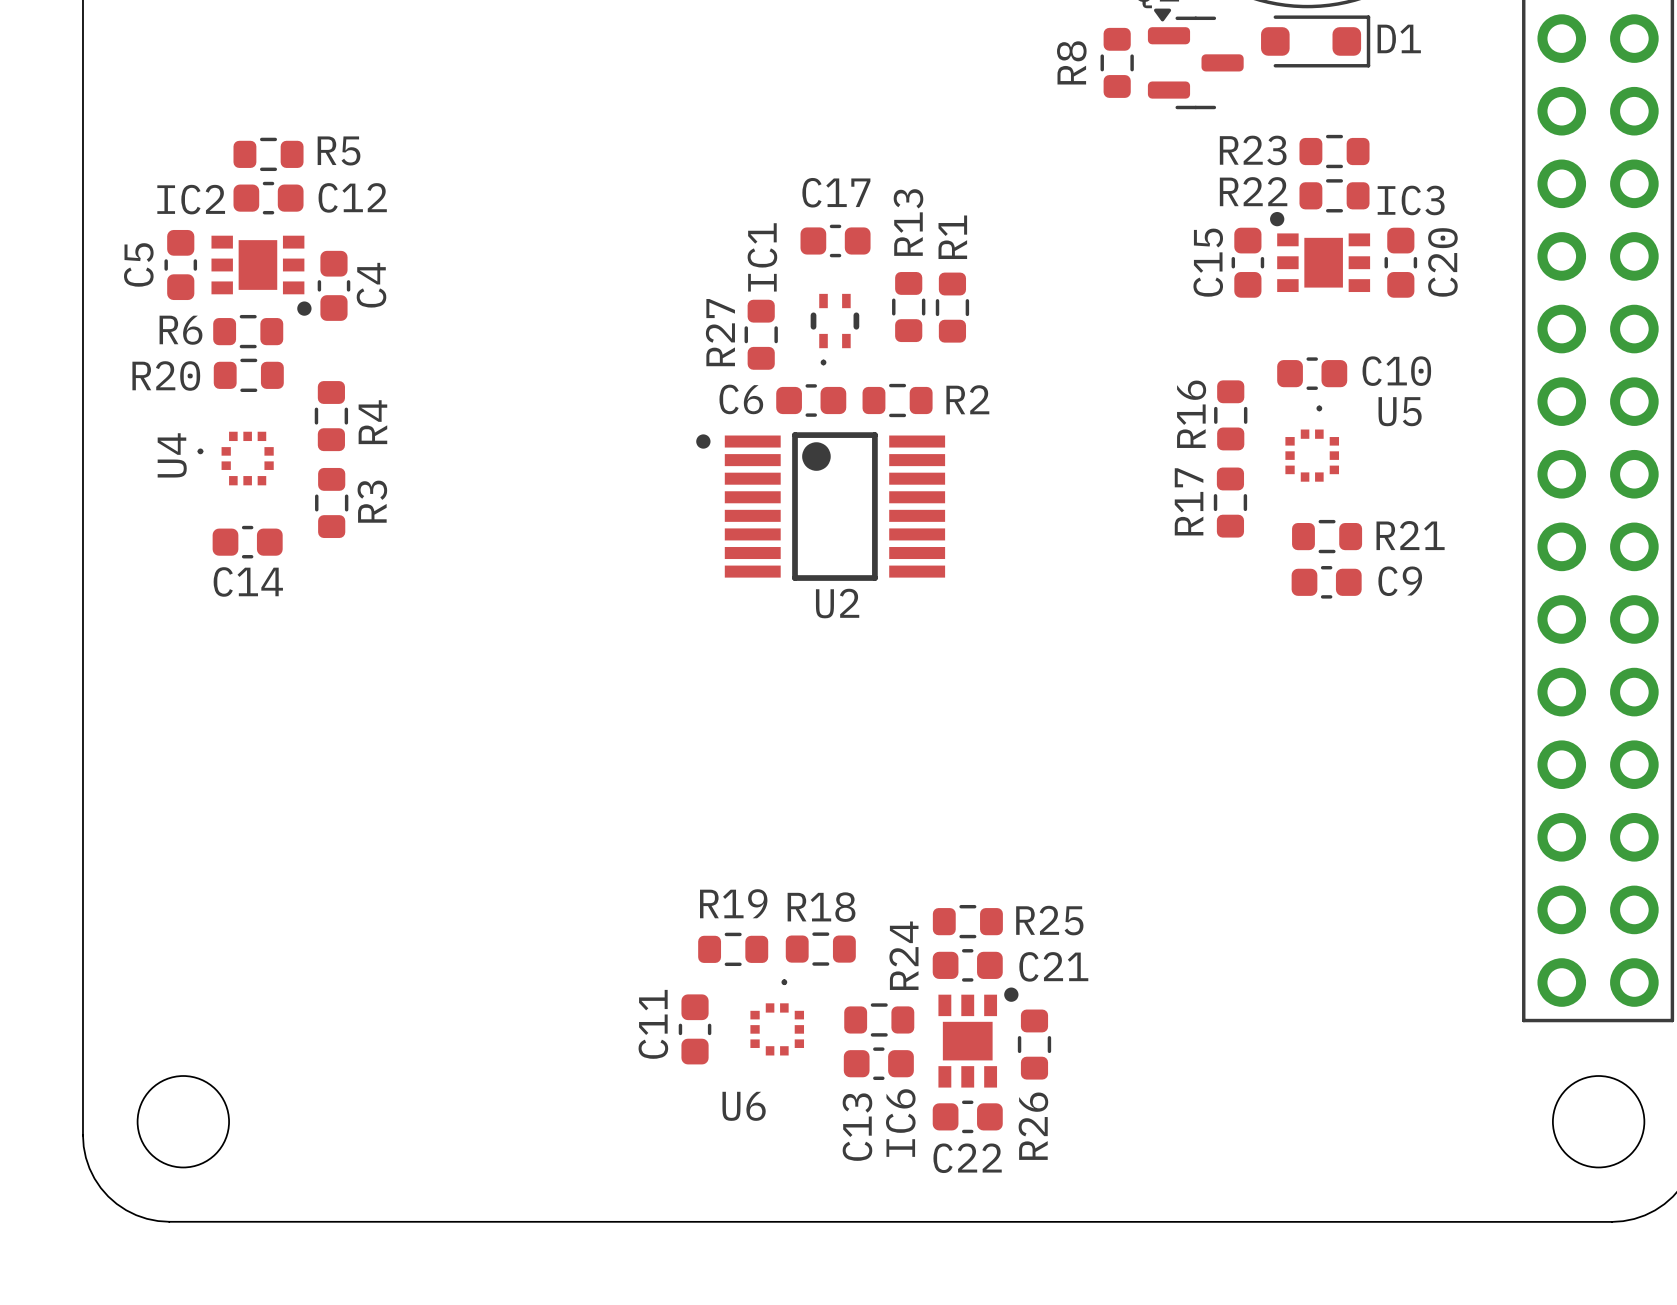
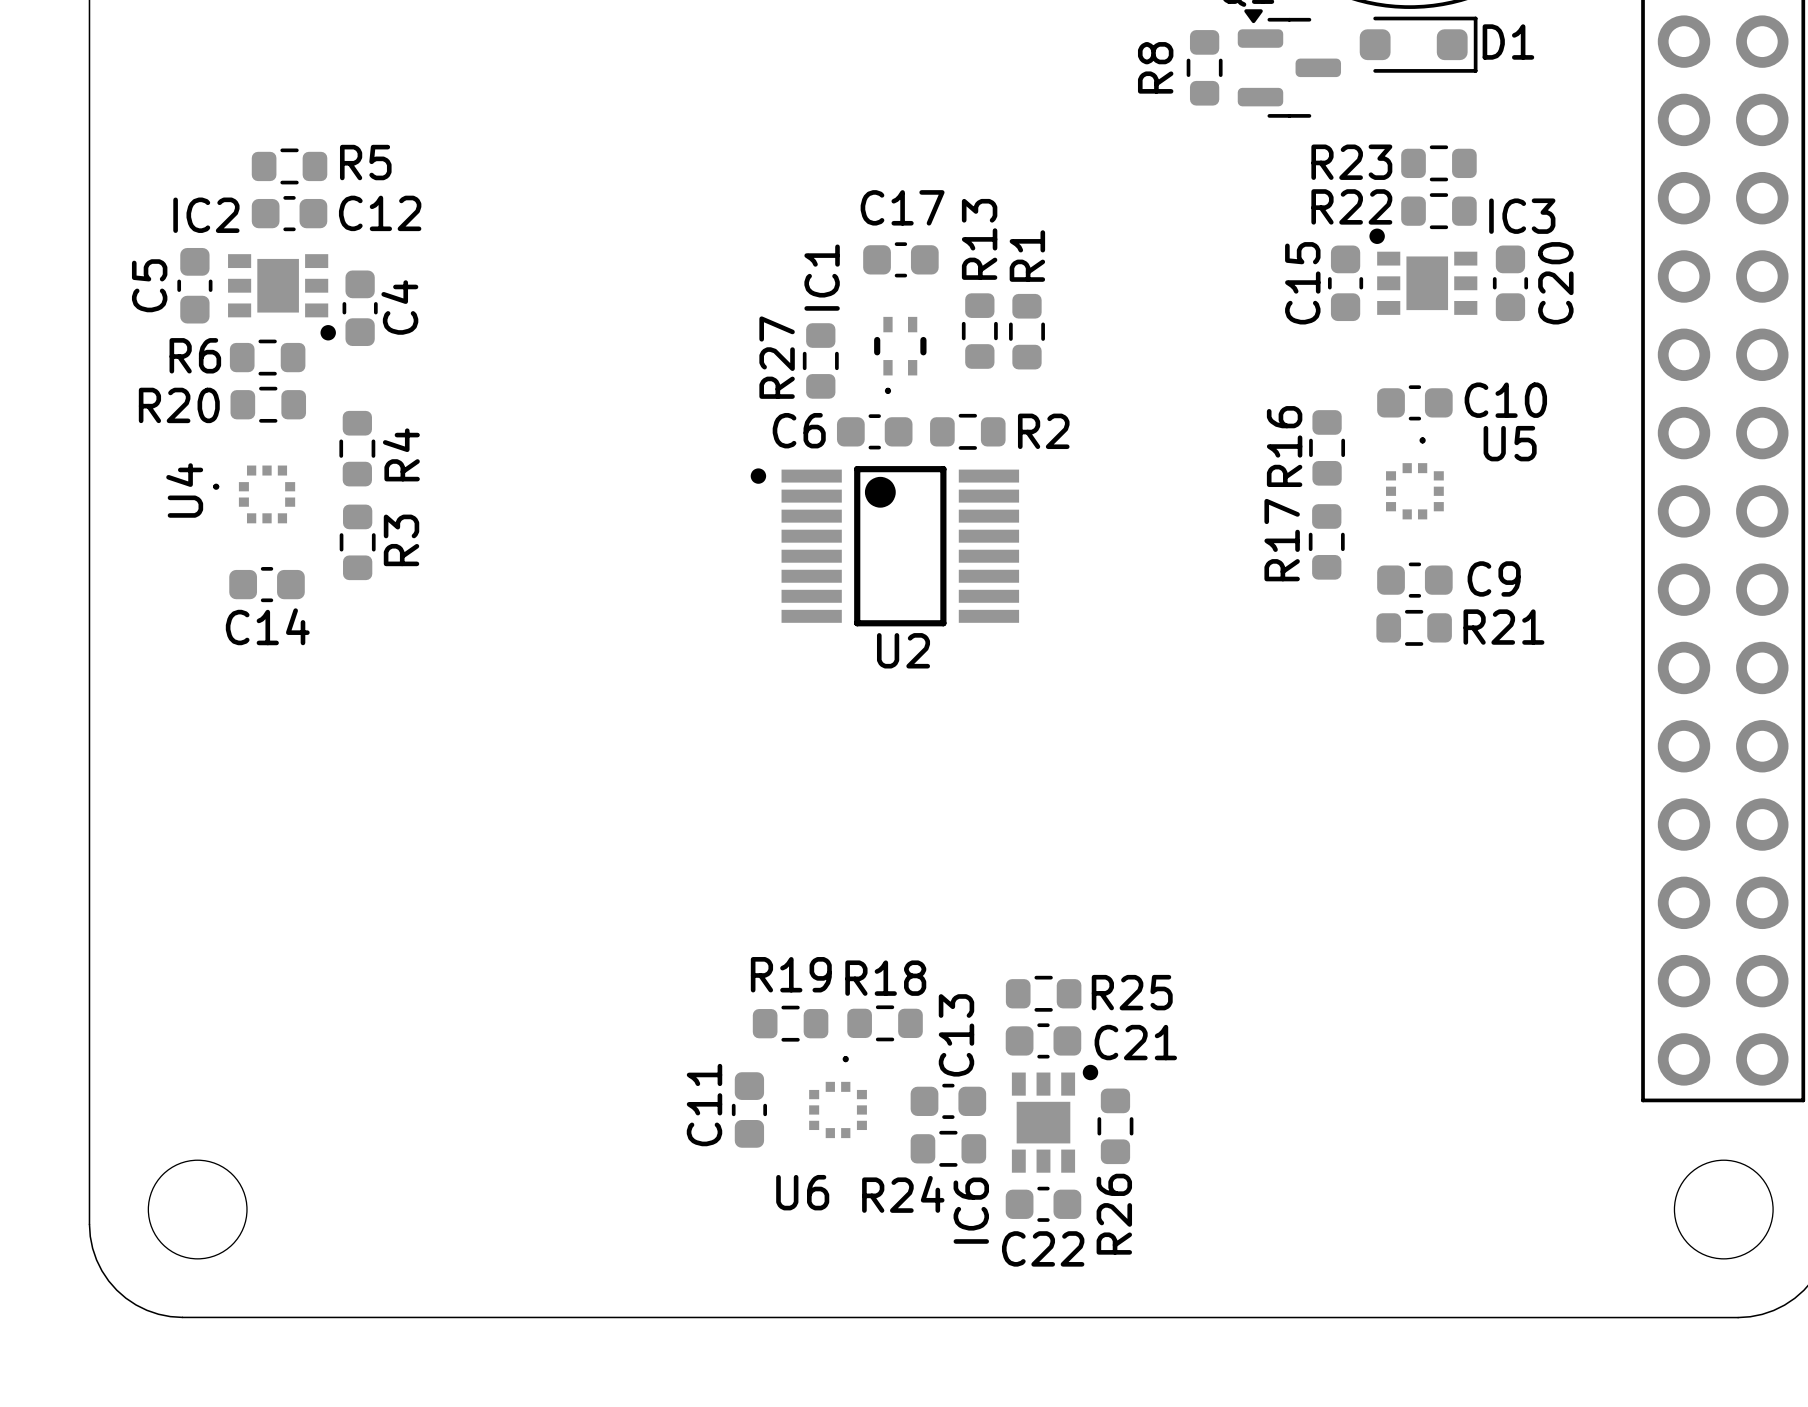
R21 position: (1327, 536) -> (1414, 627)
C9 position: (1326, 582) -> (1414, 580)
R24 name rotation: 0° (903, 955) -> 90° clockwise (903, 1194)
R24 name position: R24 (903, 955) -> R24 (903, 1194)
R24 position: (879, 1019) -> (948, 1148)
C13 position: (878, 1063) -> (948, 1101)
C13 name position: C13 (857, 1127) -> C13 (956, 1035)

